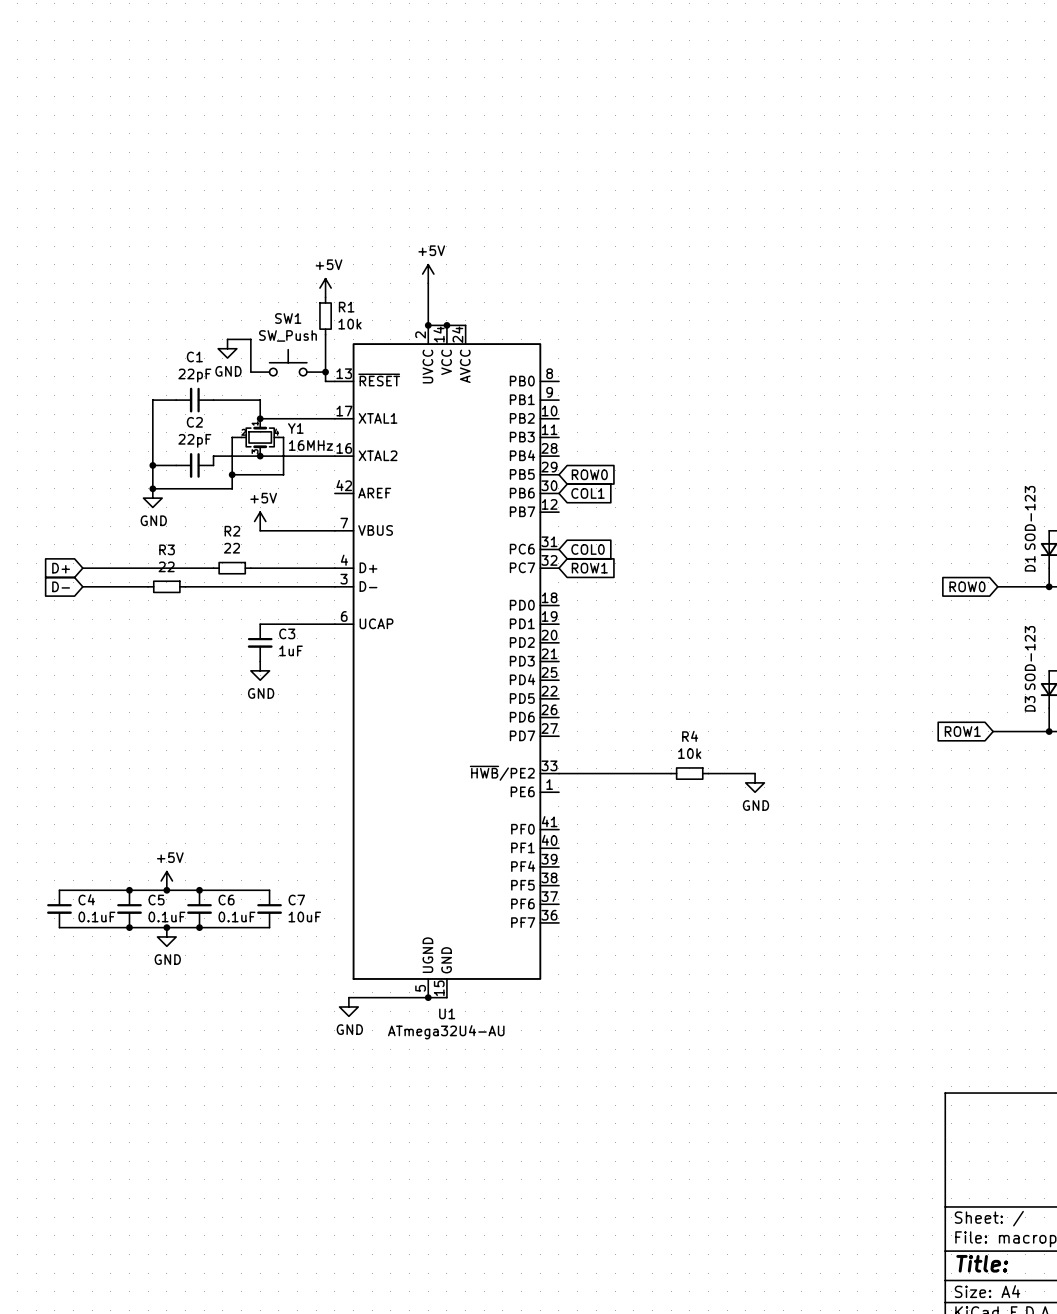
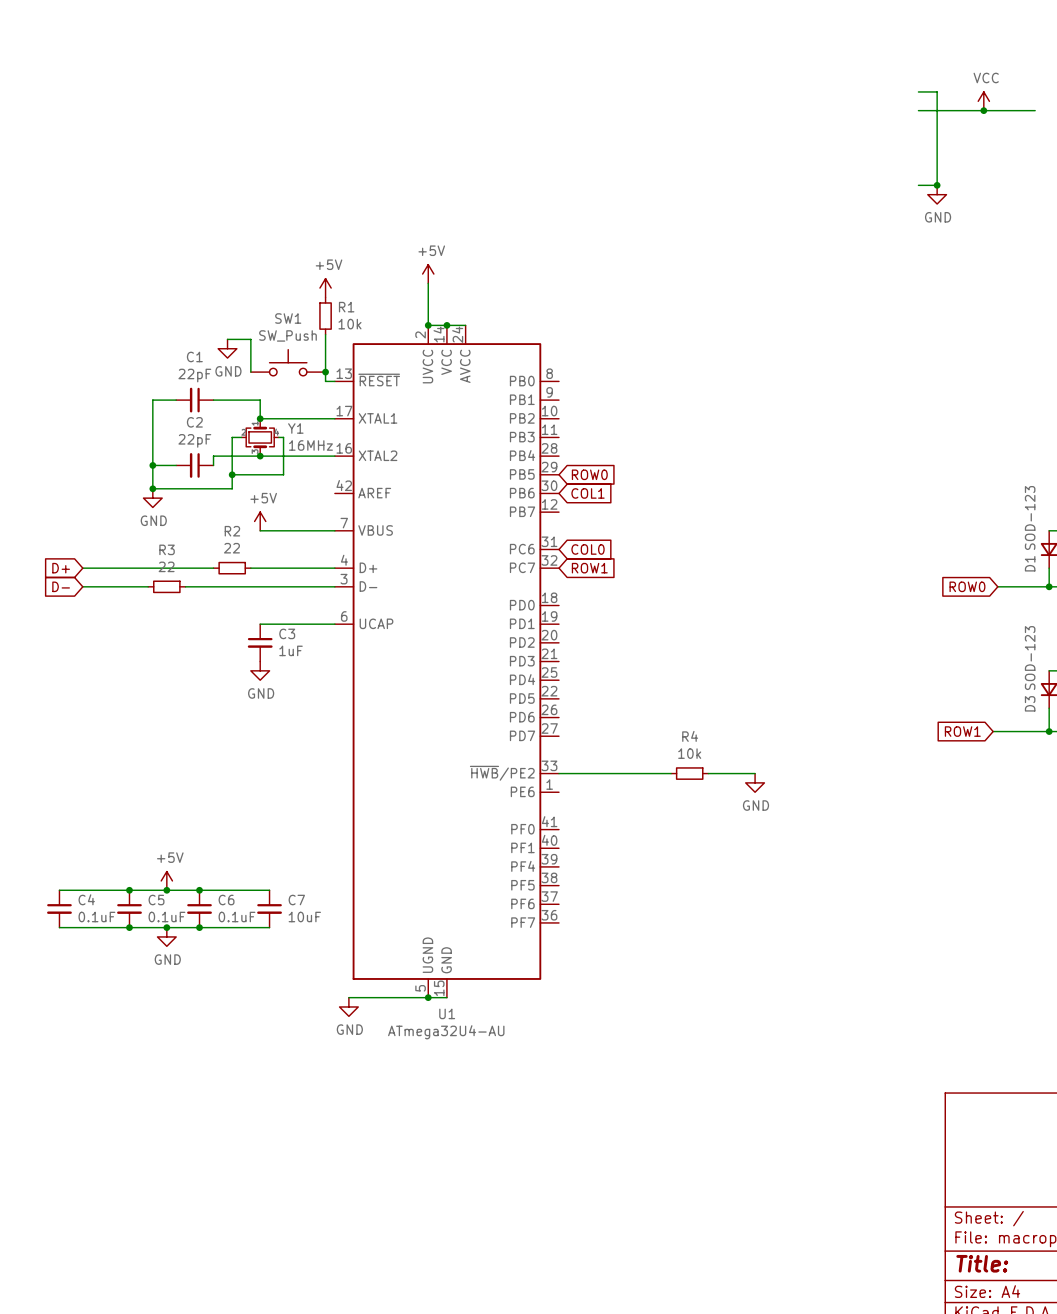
wire: none -> (918, 91) (937, 91) (937, 185) (918, 185)
power symbol: none -> VCC (983, 101)
wire: none -> (918, 110) (1035, 110)
junction: none -> (983, 110)
junction: none -> (937, 185)
power symbol: none -> GND (937, 194)

